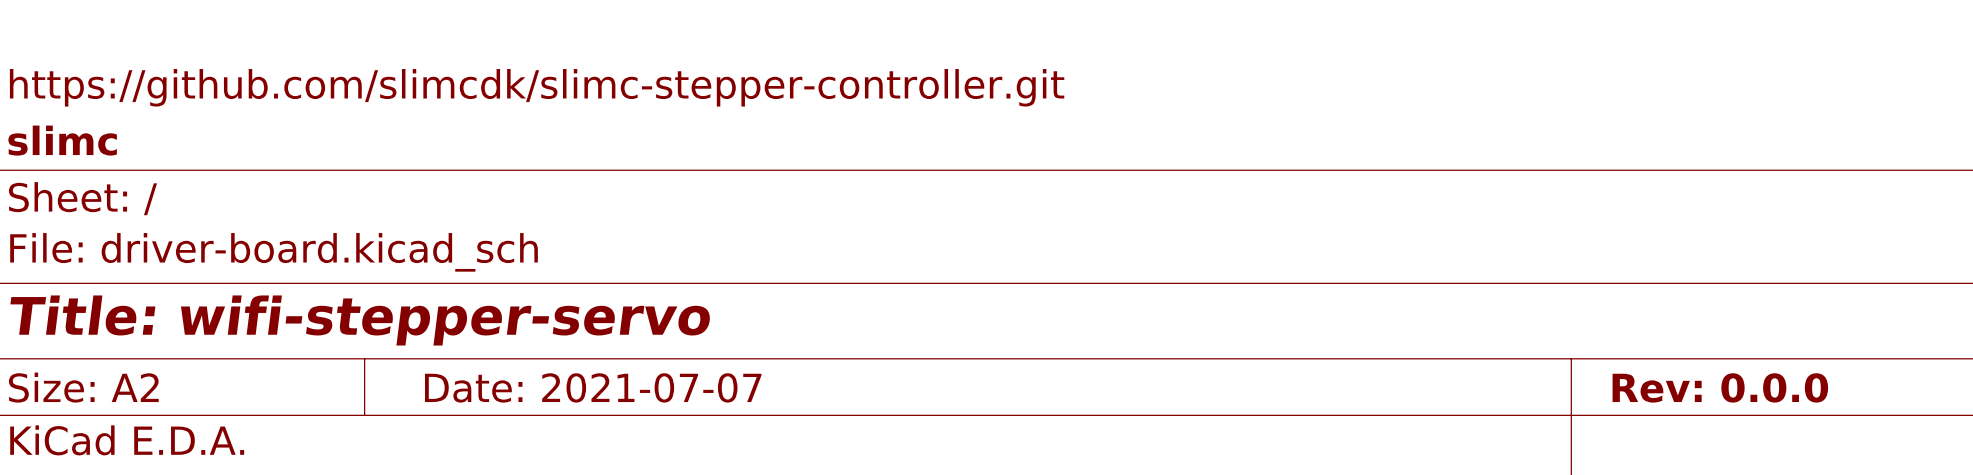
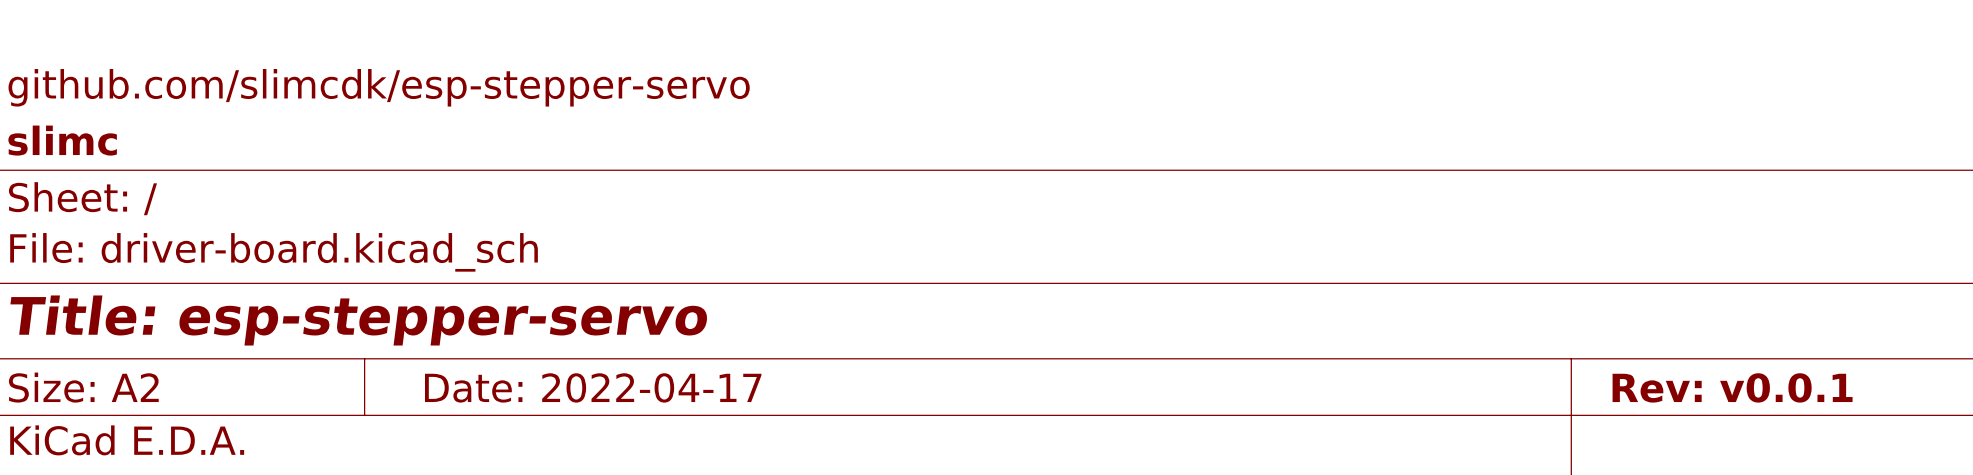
title block: https://github.com/slimcdk/slimc-stepper-controller.git (537, 87) -> github.com/slimcdk/esp-stepper-servo (379, 87)
title block: Title: wifi-stepper-servo (360, 320) -> Title: esp-stepper-servo (359, 320)
title block: Date: 2021-07-07 (593, 387) -> Date: 2022-04-17 (593, 387)
title block: Rev: 0.0.0 (1720, 387) -> Rev: v0.0.1 (1732, 387)

